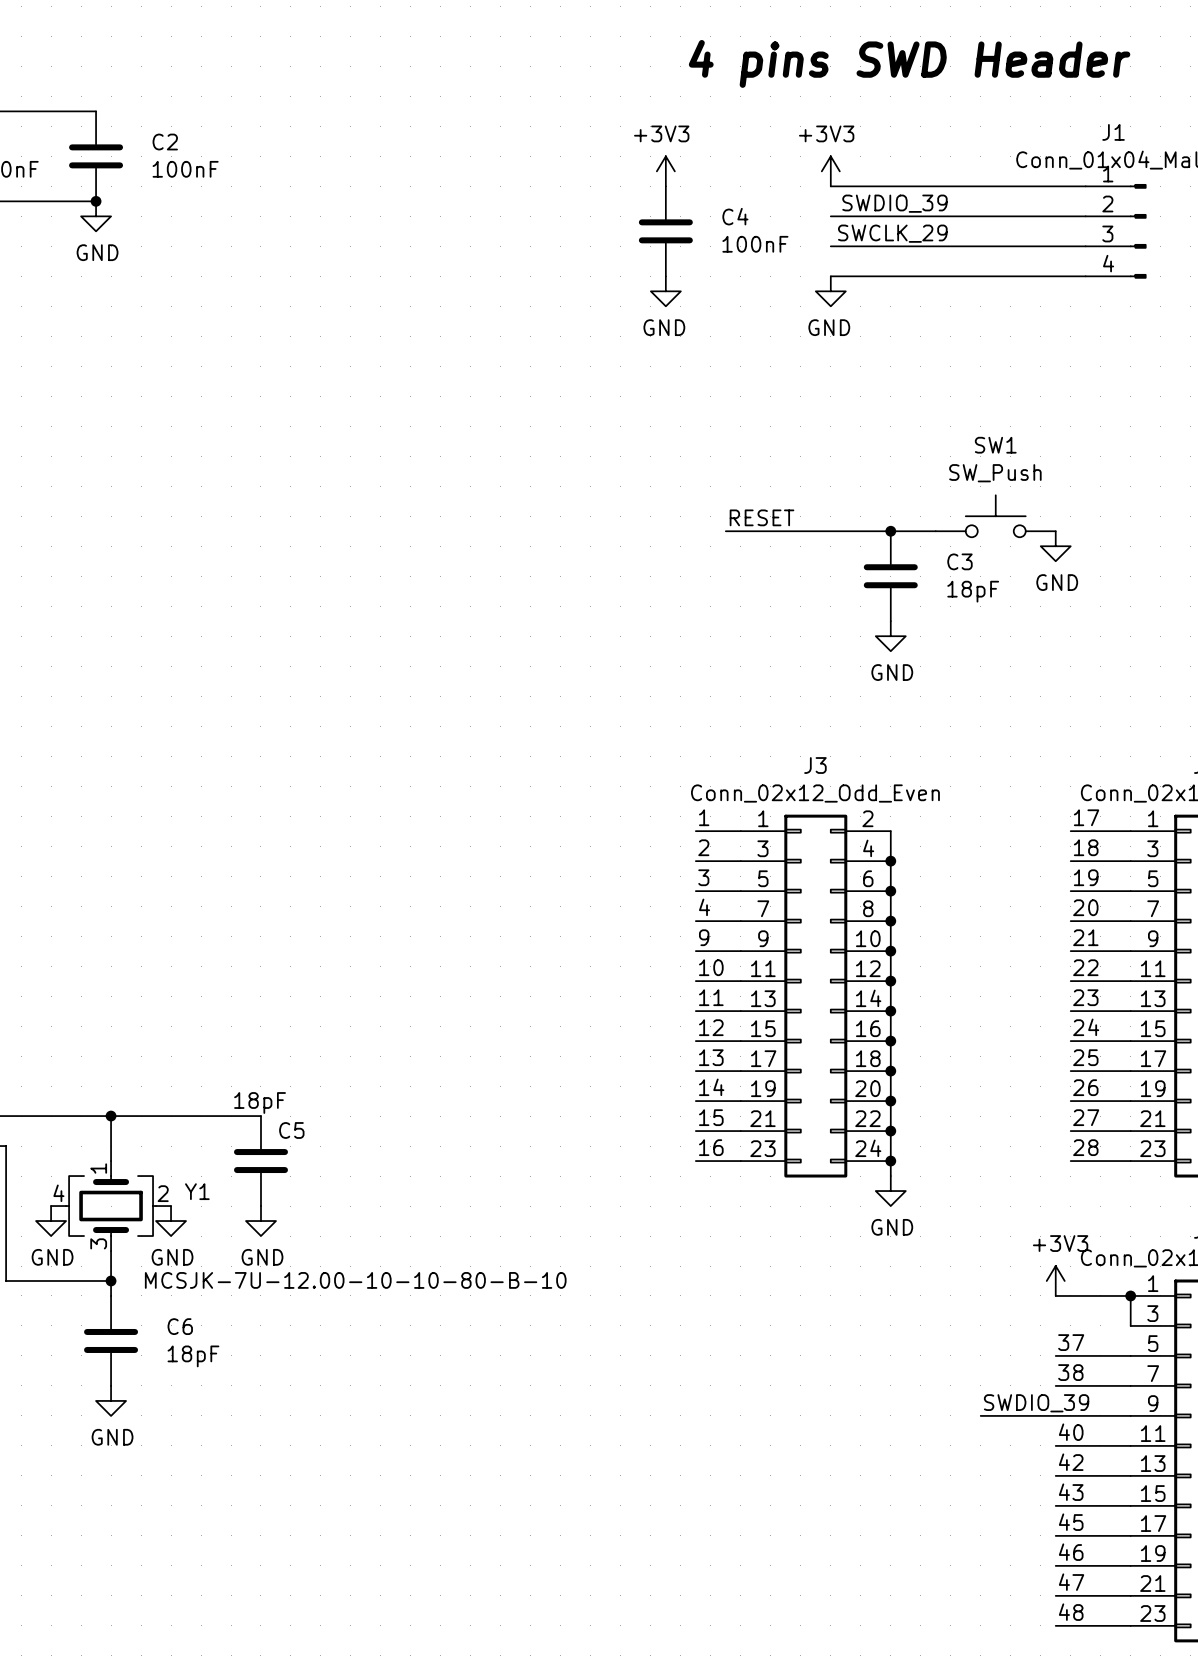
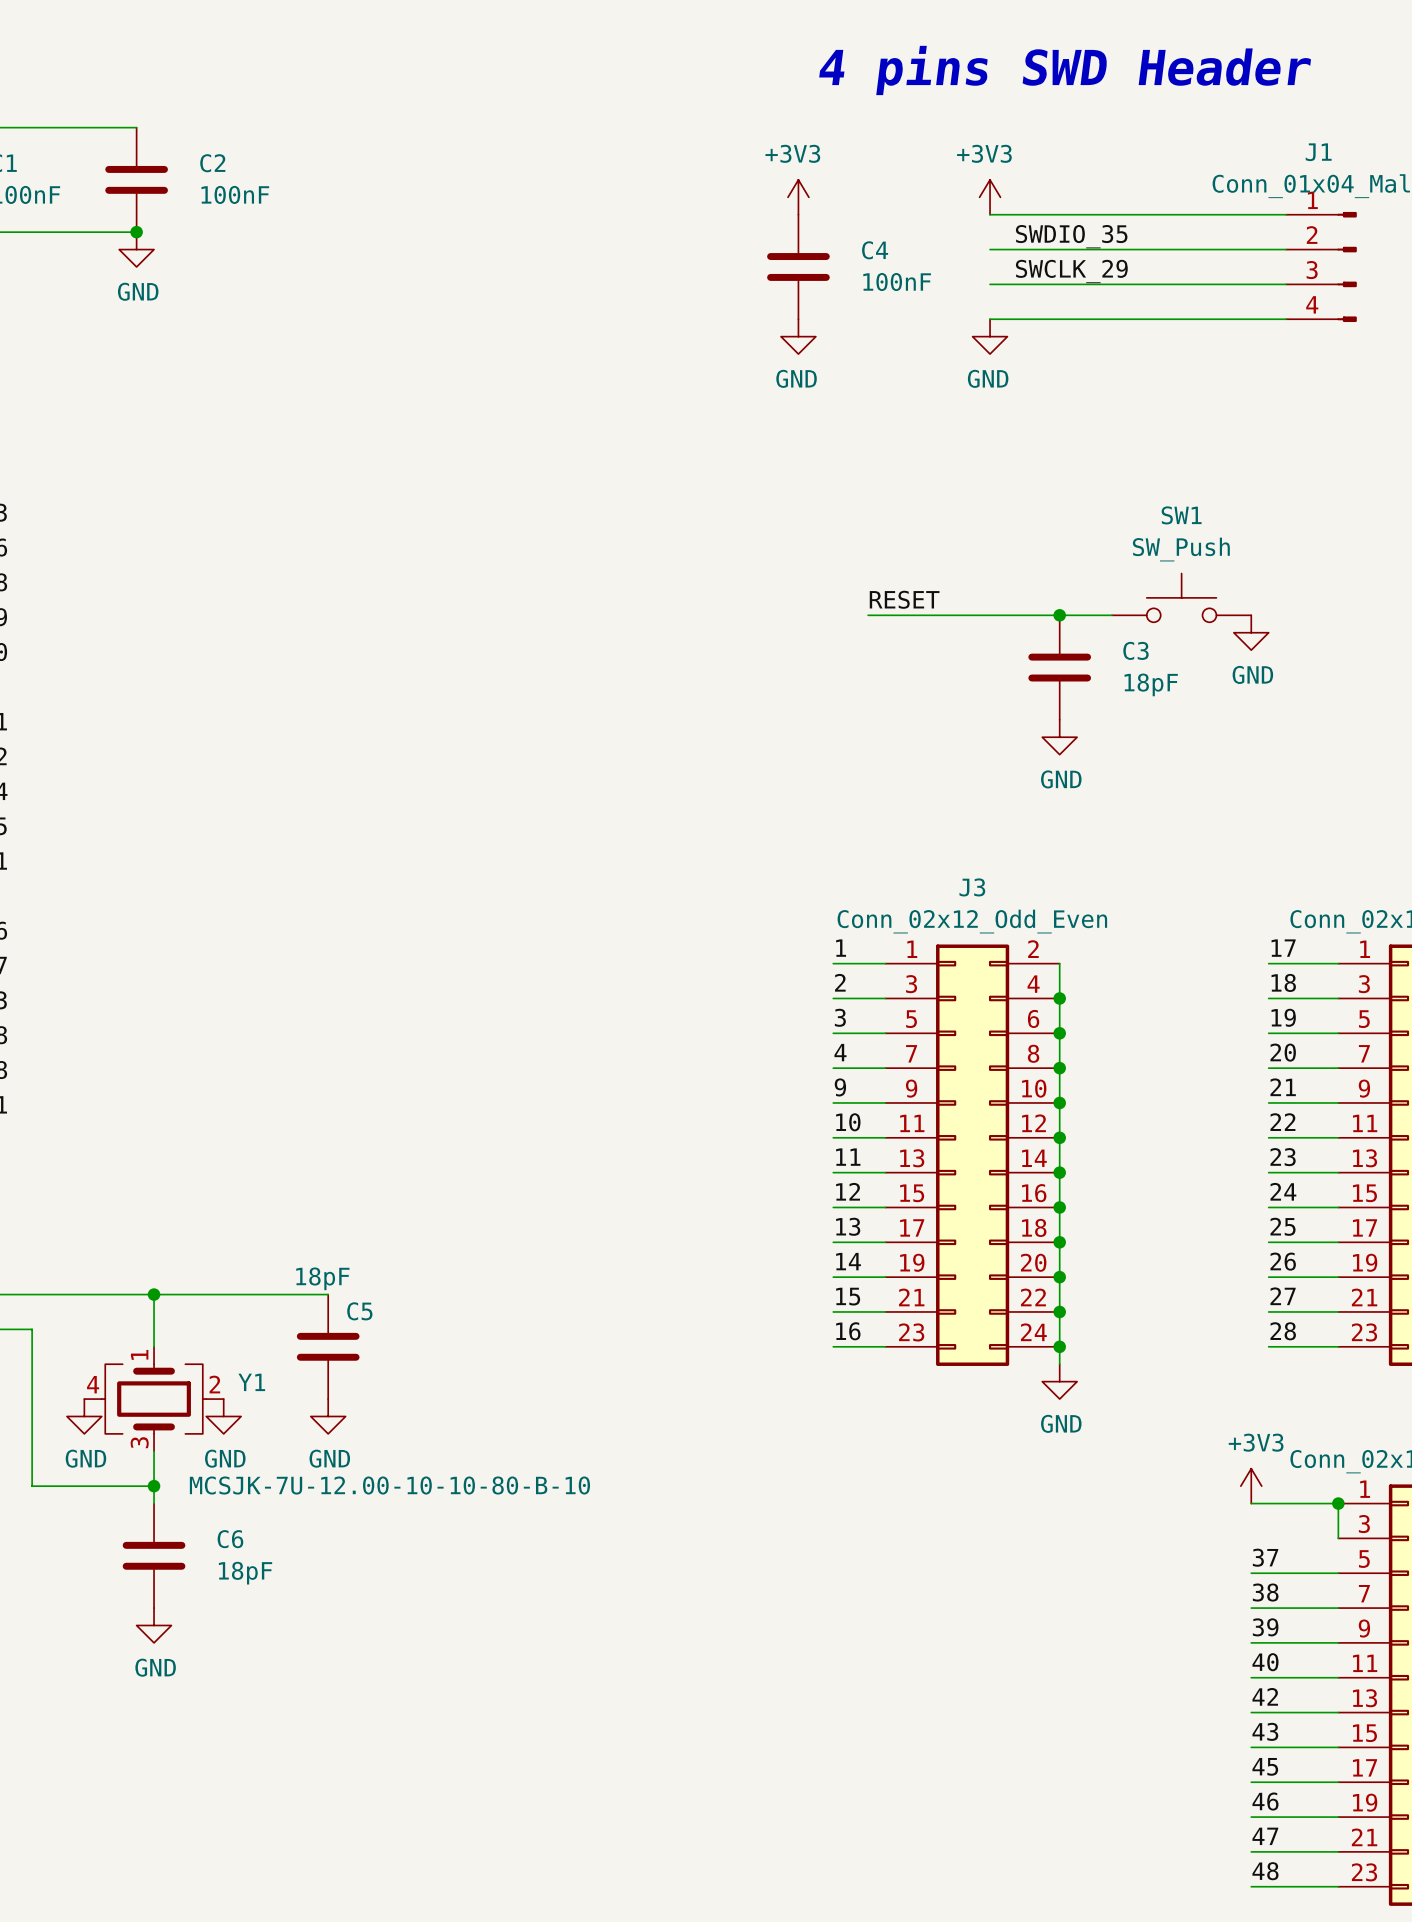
label: SWDIO_39 (894, 203) -> SWDIO_35 (1071, 236)
label: none -> 39 (1265, 1627)
label: SWDIO_39 (1036, 1403) -> none
wire: (980, 1415) (1055, 1415) -> none

